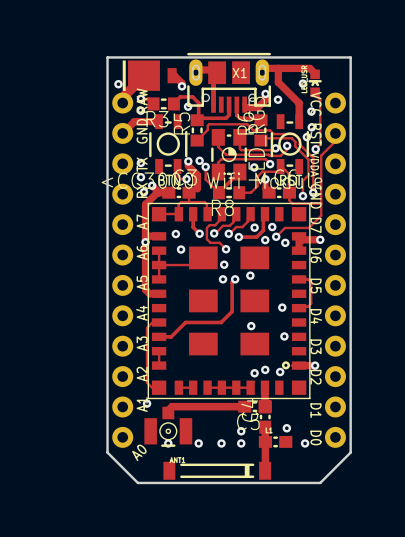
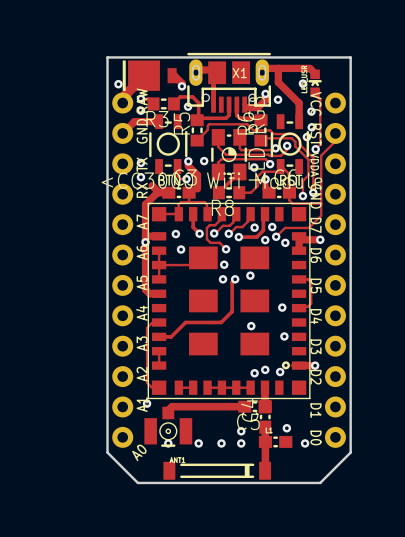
via: (199, 160) -> none
via: none -> (204, 161)
track: (205, 166) (205, 179) (218, 192) -> none
via: (205, 166) -> none
via: (152, 185) -> none
via: (143, 192) -> none

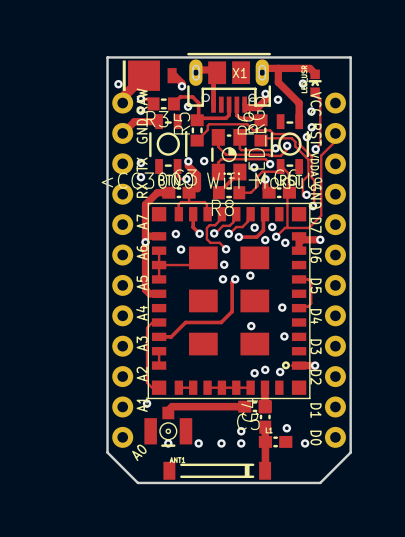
track: (311, 156) (313, 192) -> (311, 156) (311, 177) (314, 180) (312, 206)
track: (152, 185) (159, 192) -> none
track: (289, 192) (289, 200) (292, 203) (321, 203) -> (289, 192) (287, 194) (287, 227)
via: (313, 192) -> none
via: none -> (306, 194)
via: (302, 196) -> none
via: none -> (312, 206)
track: (178, 214) (159, 214) -> none

